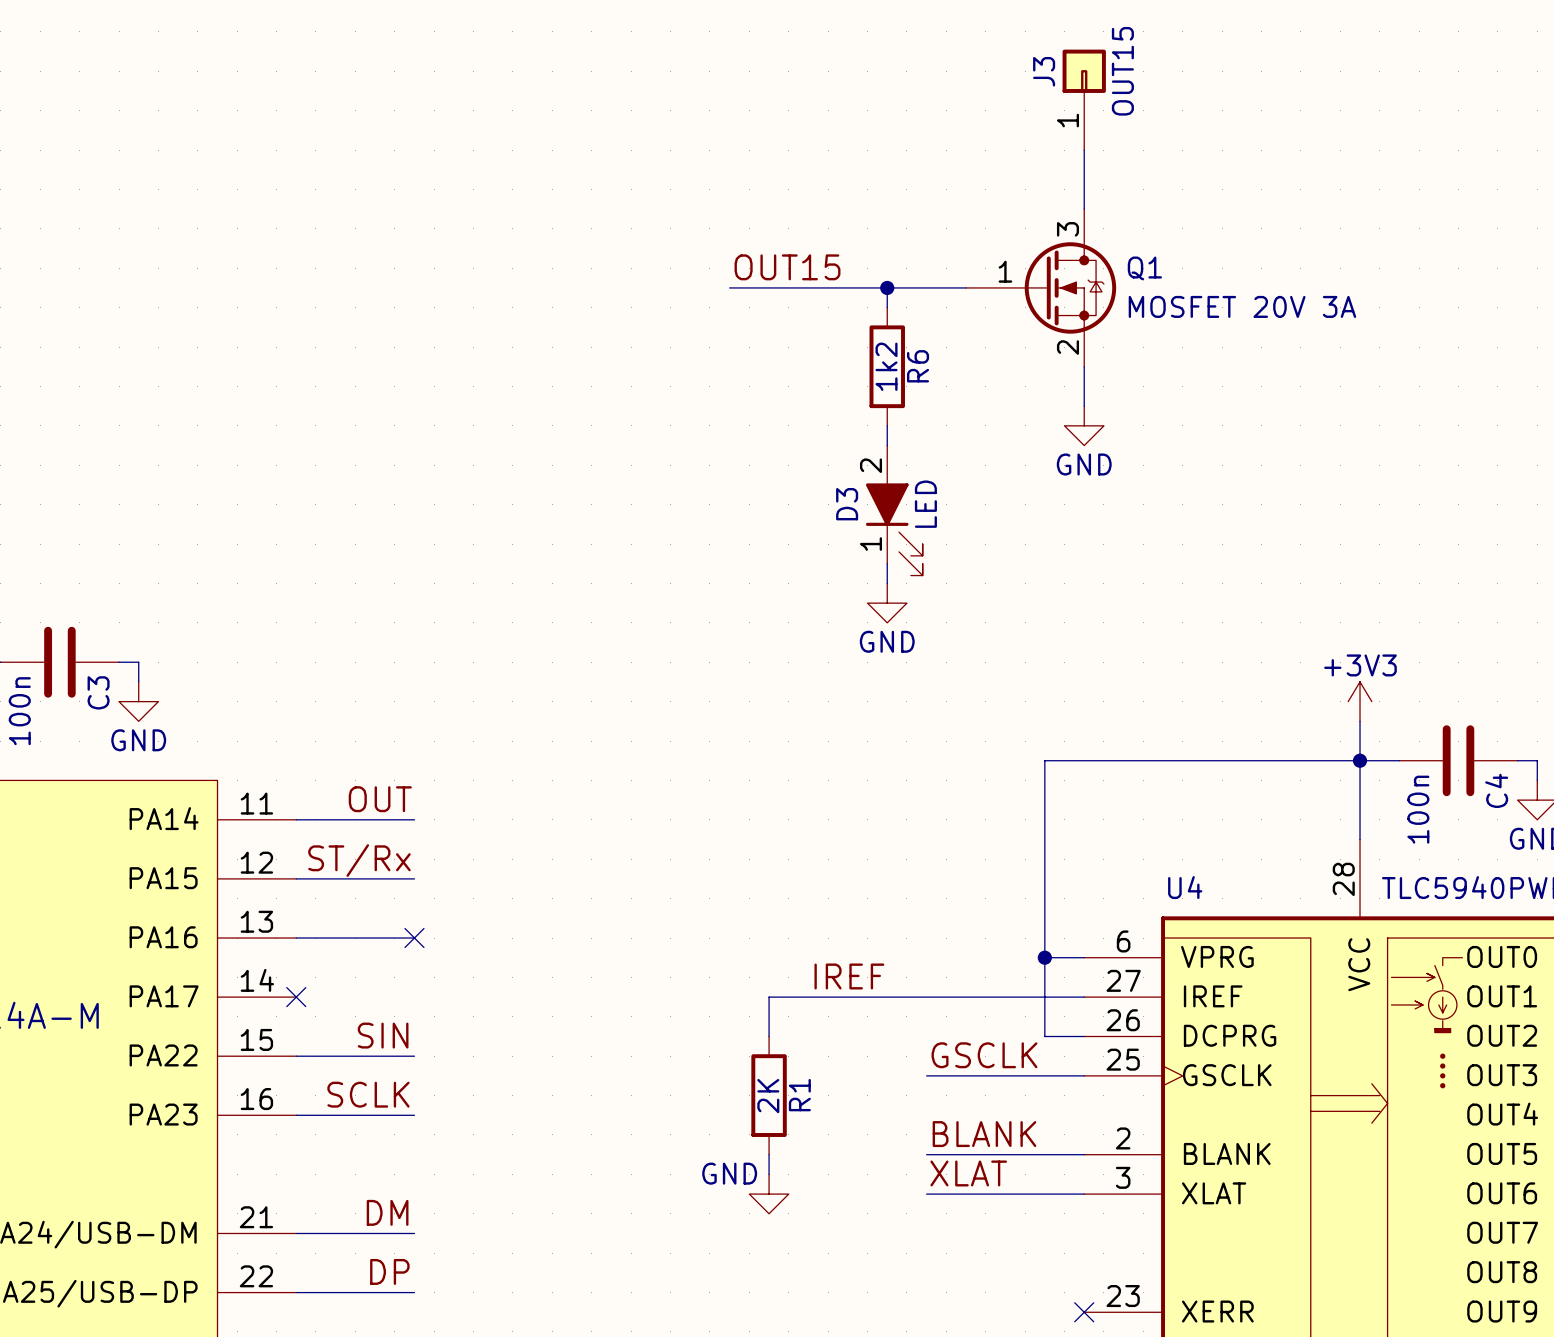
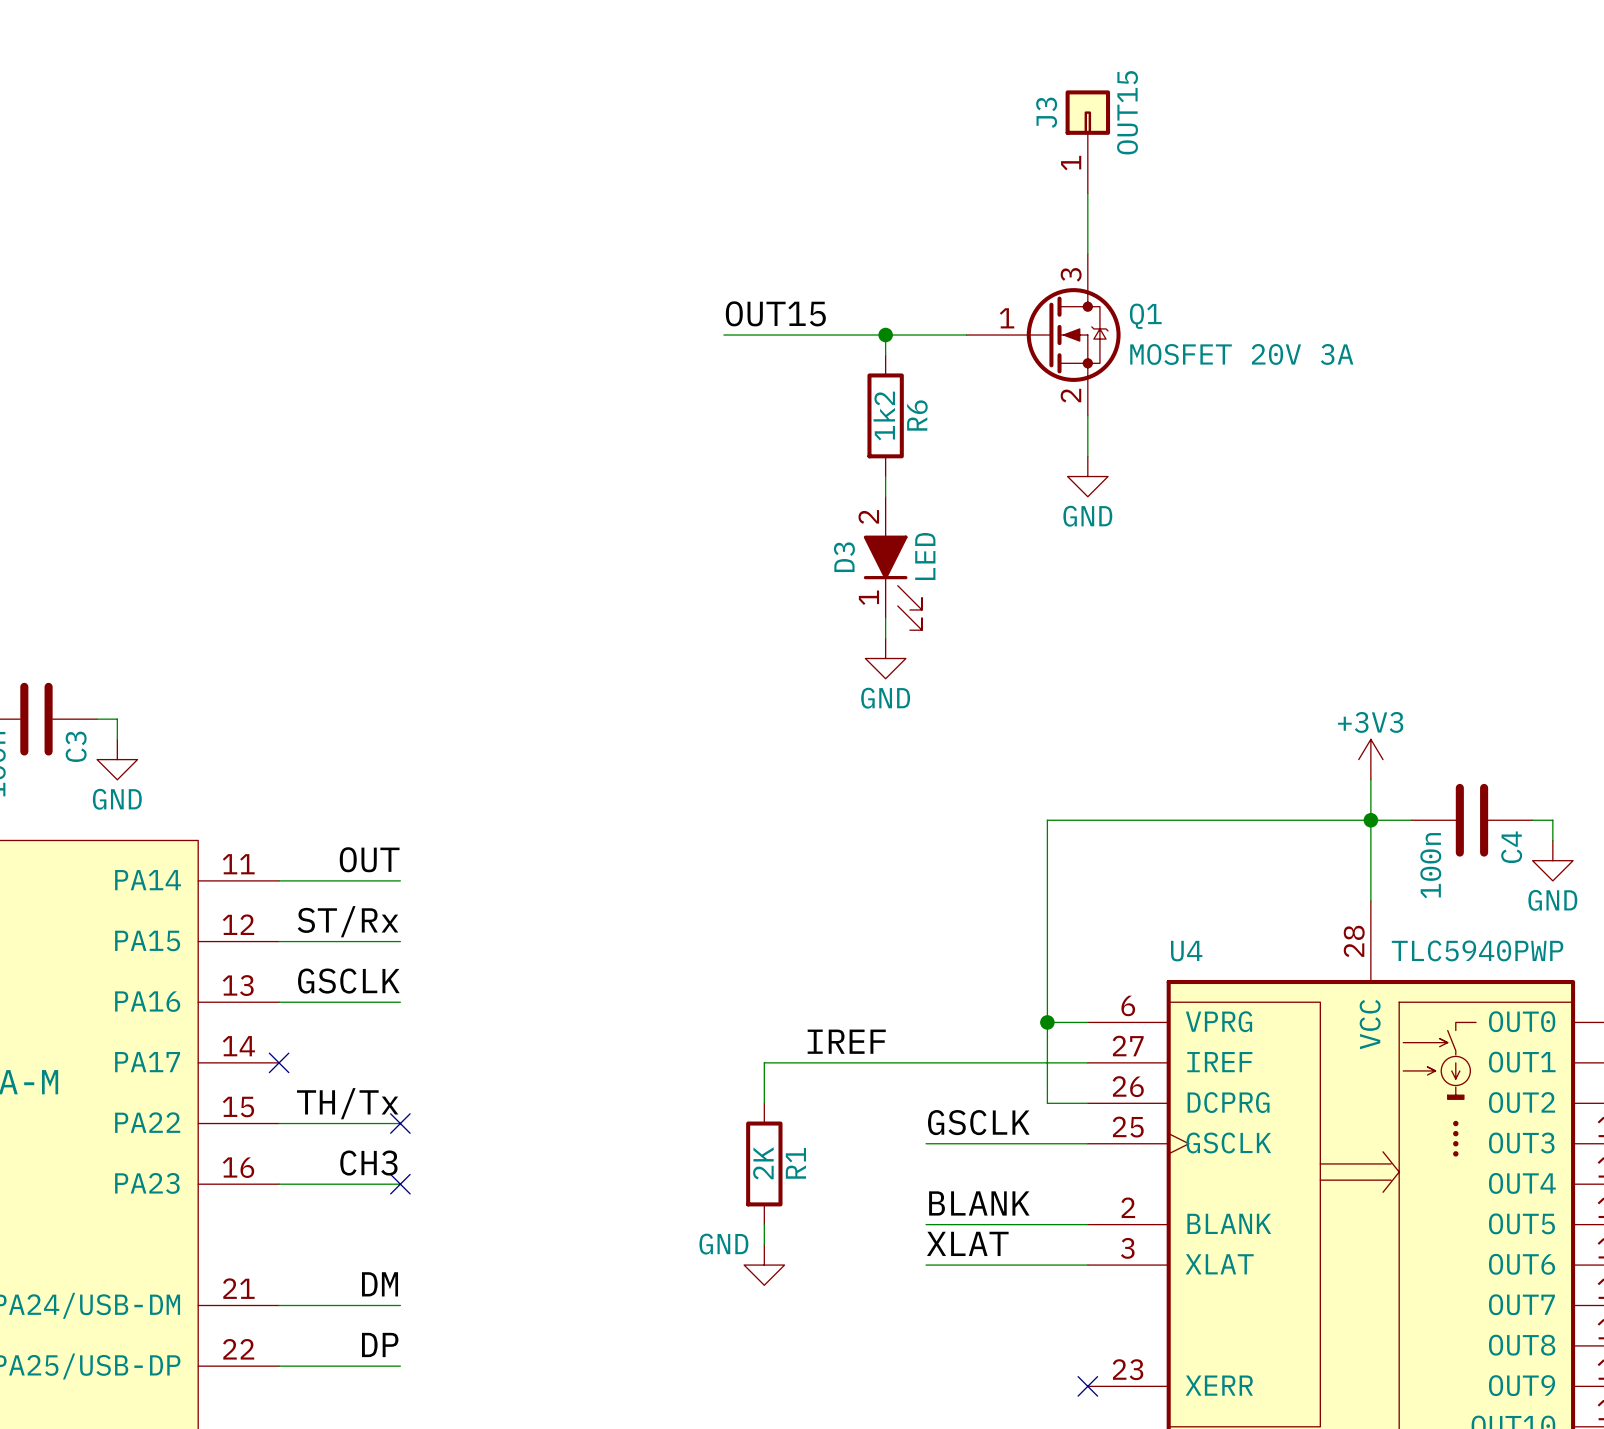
label: none -> GSCLK (348, 981)
no-connect mark: (414, 938) -> none
label: SIN (383, 1035) -> TH/Tx (347, 1103)
no-connect mark: none -> (400, 1123)
label: SCLK (368, 1094) -> CH3 (368, 1163)
no-connect mark: none -> (400, 1184)

